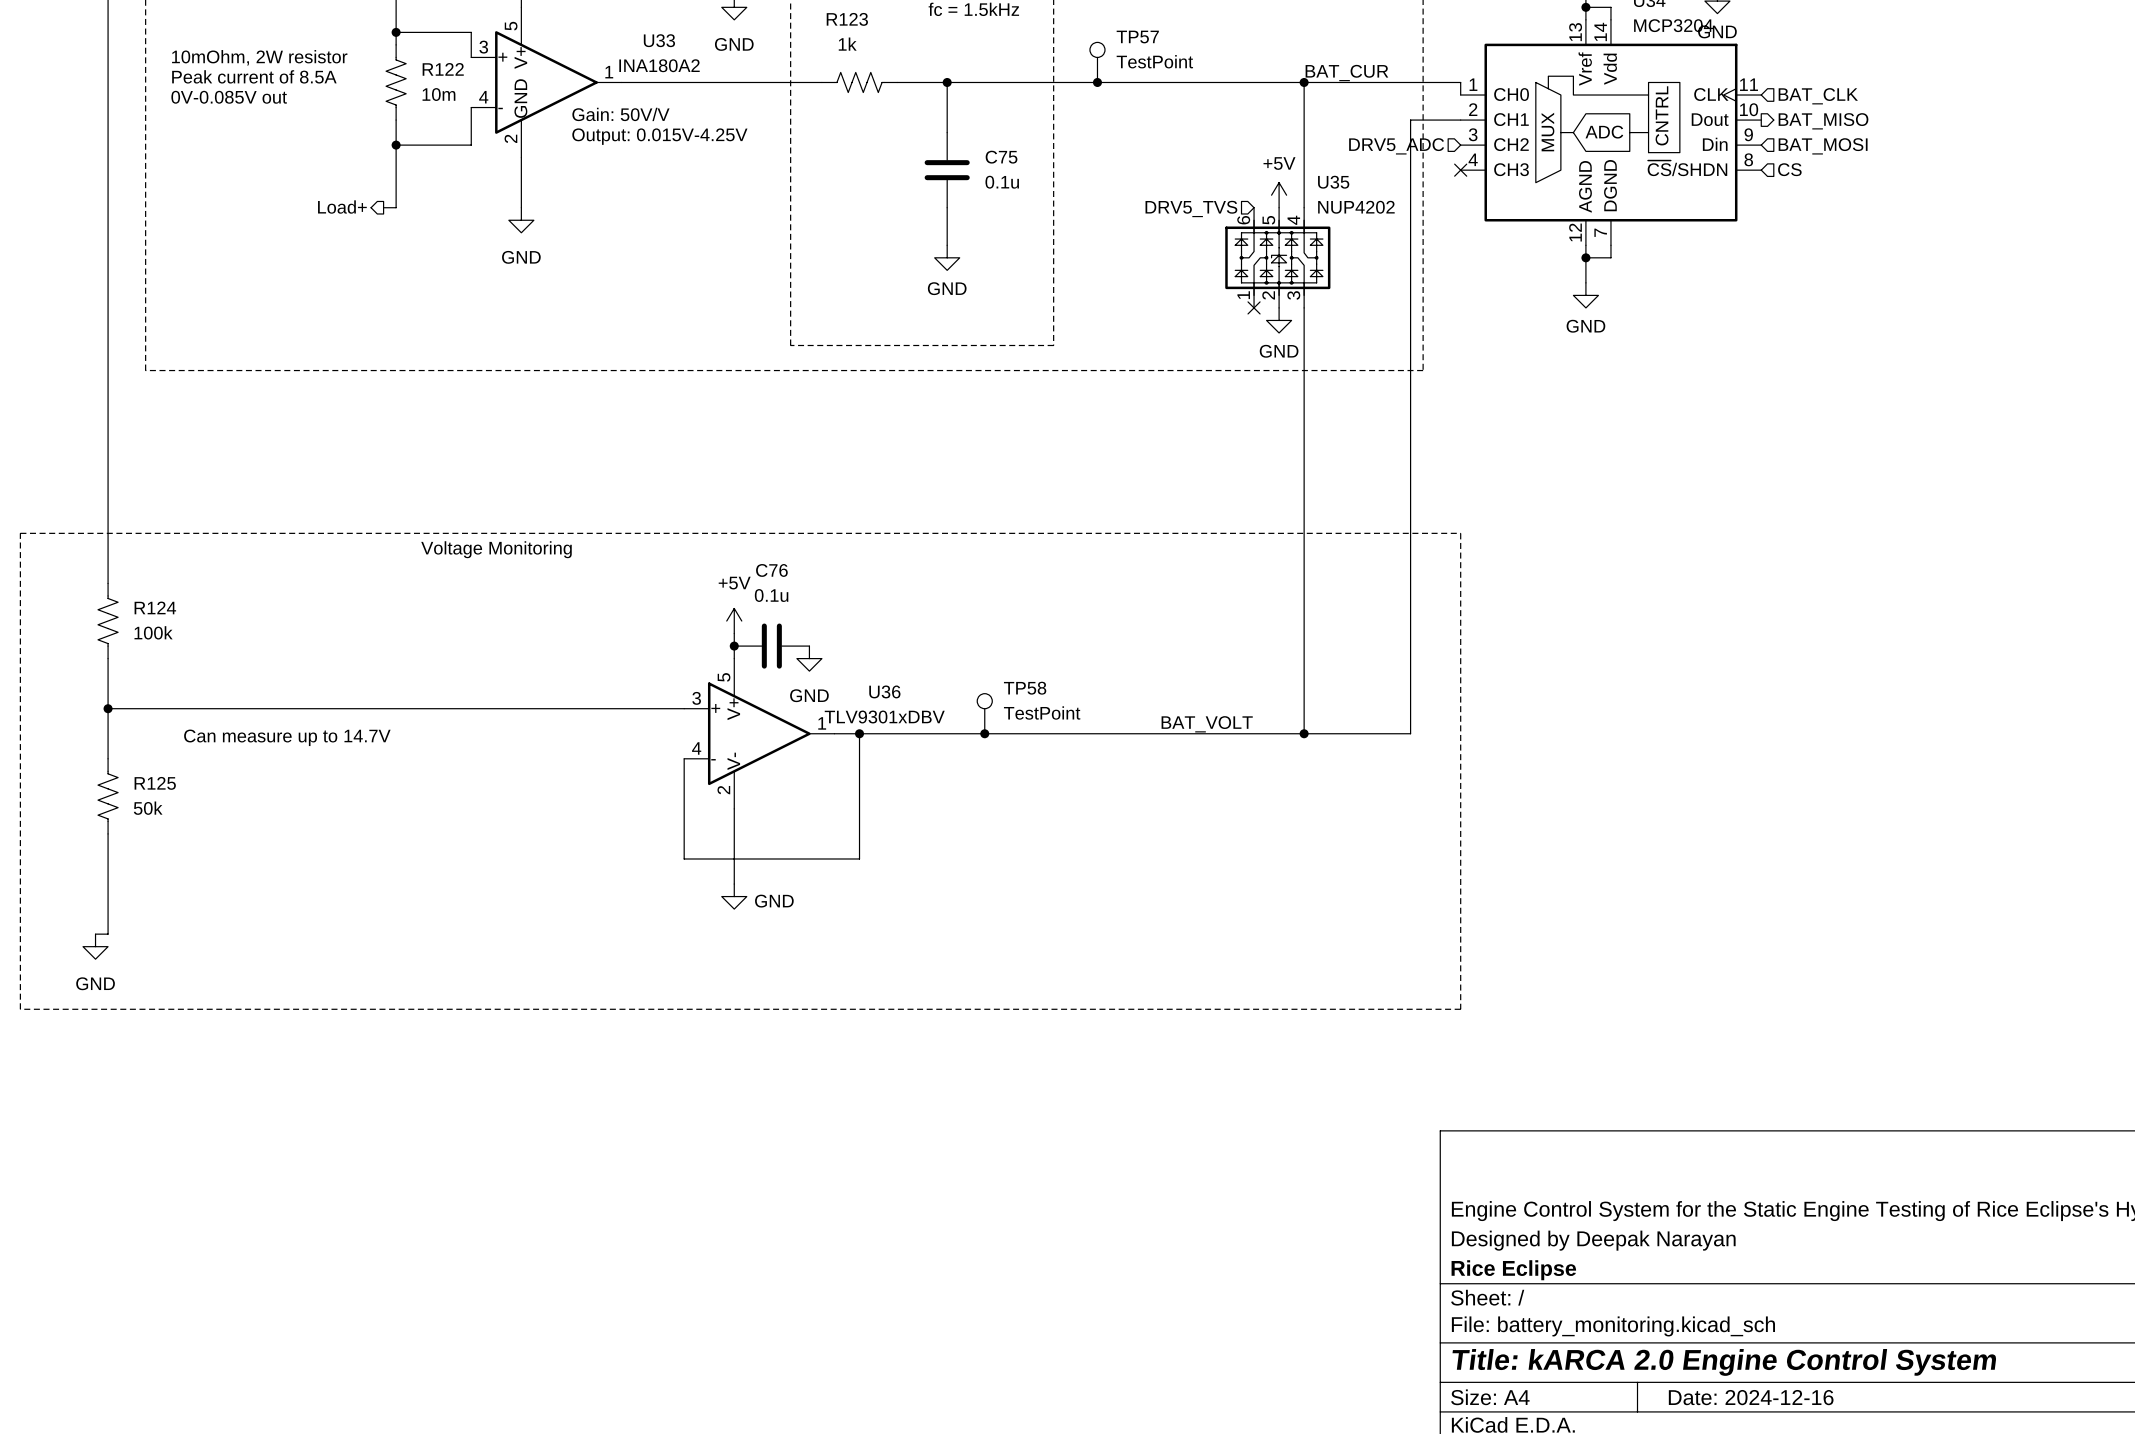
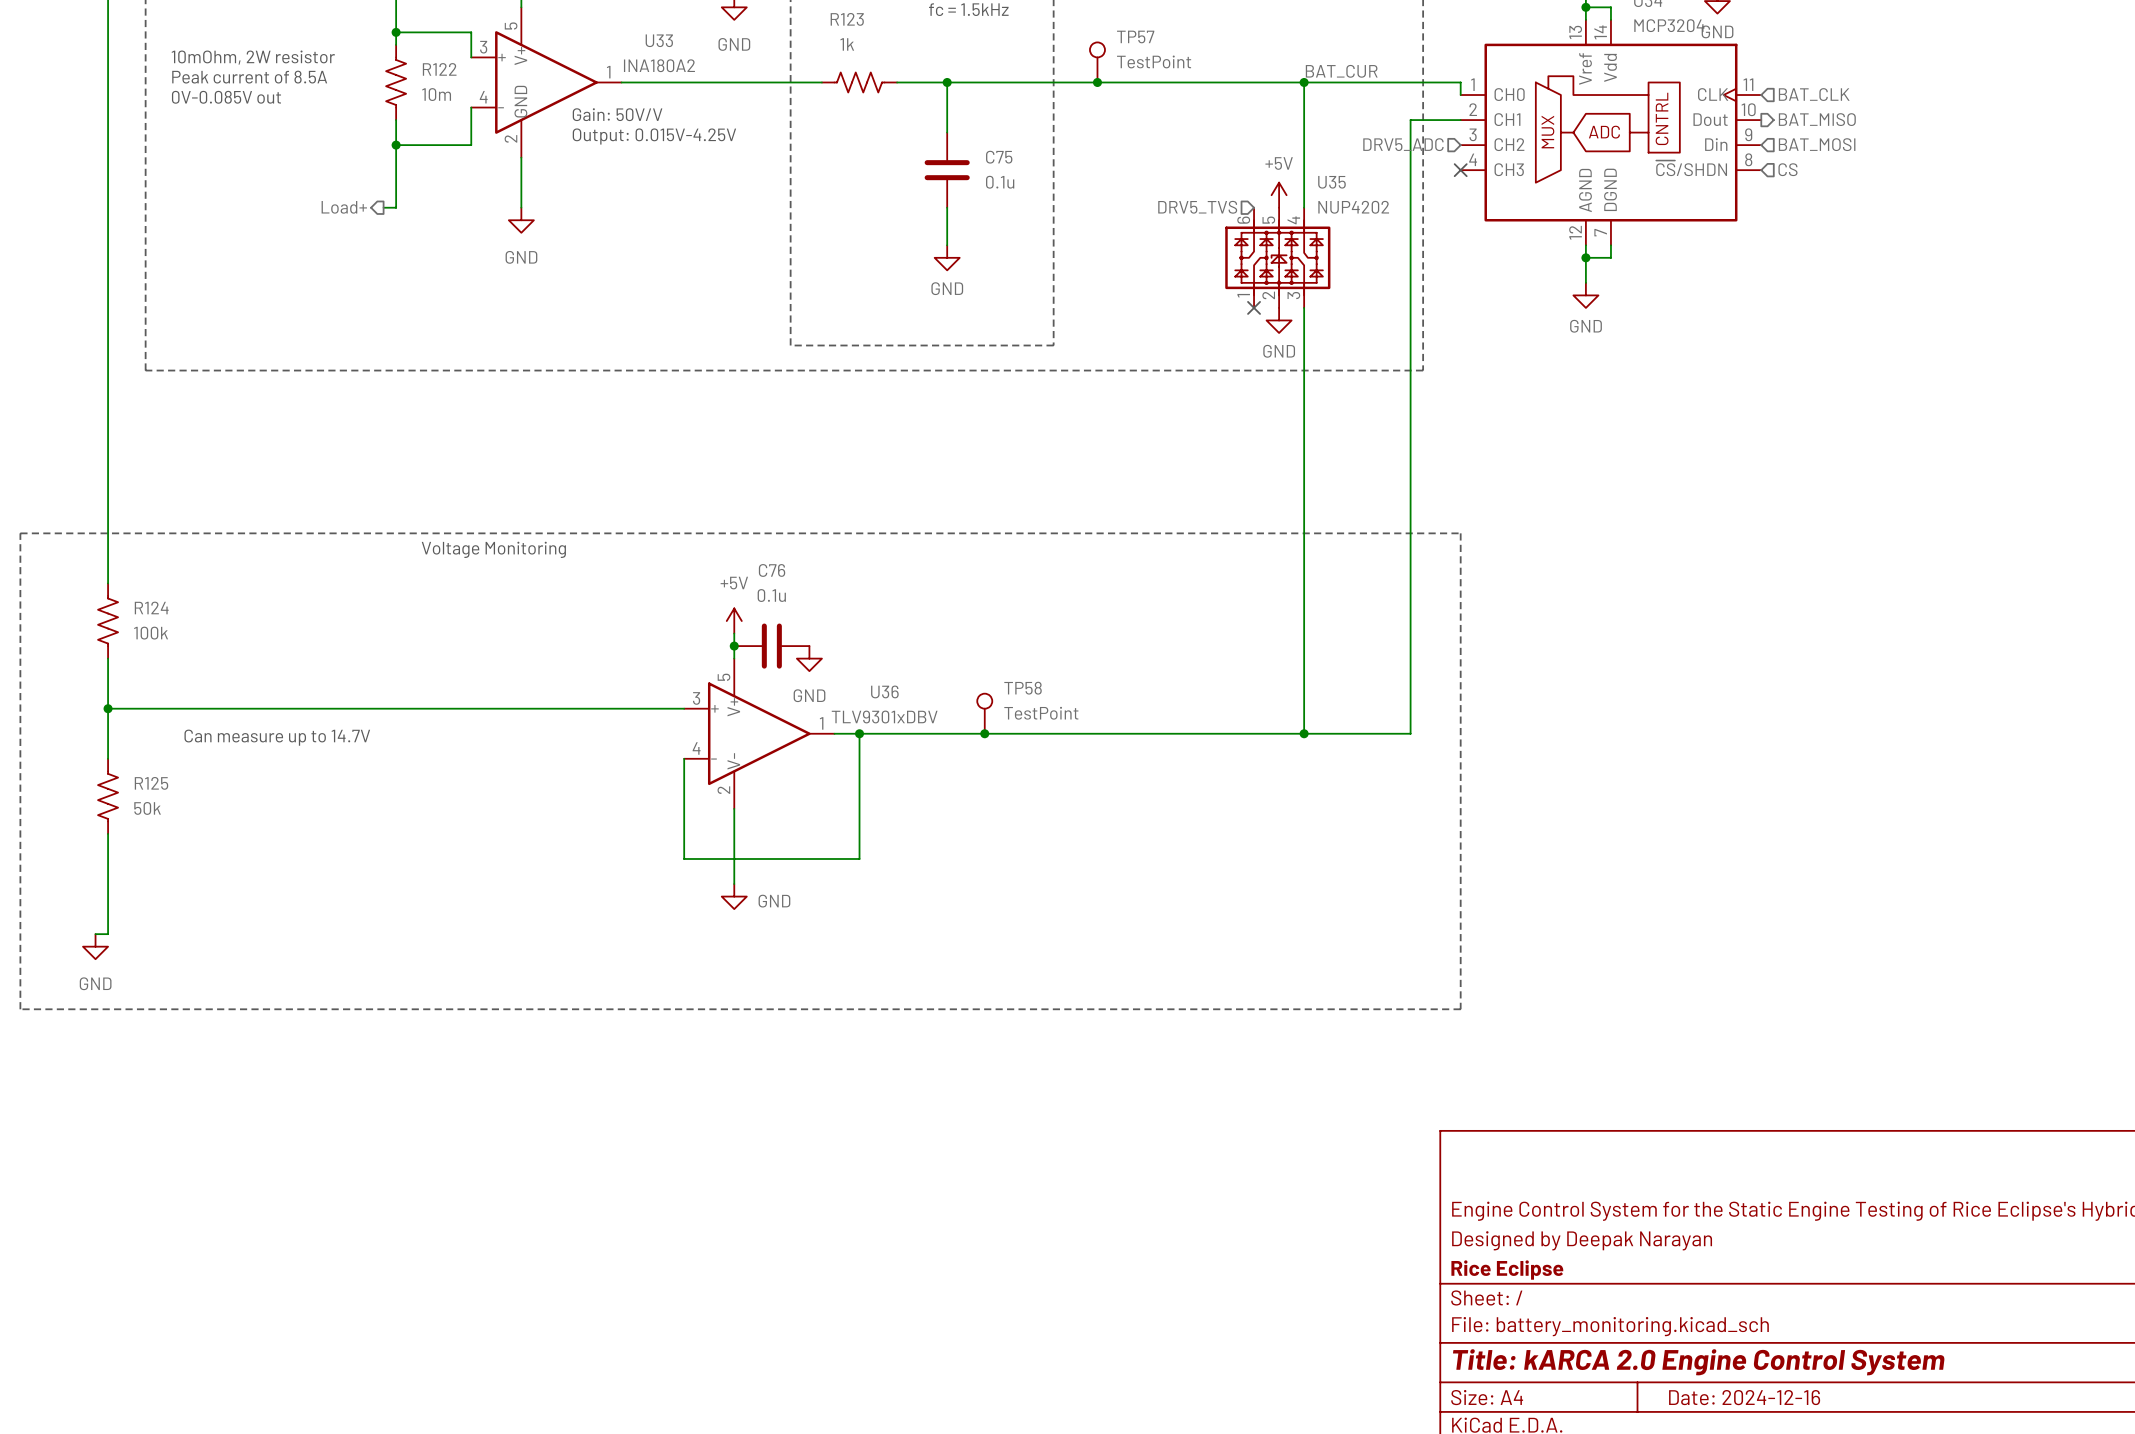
label: BAT_VOLT (1207, 724) -> none

